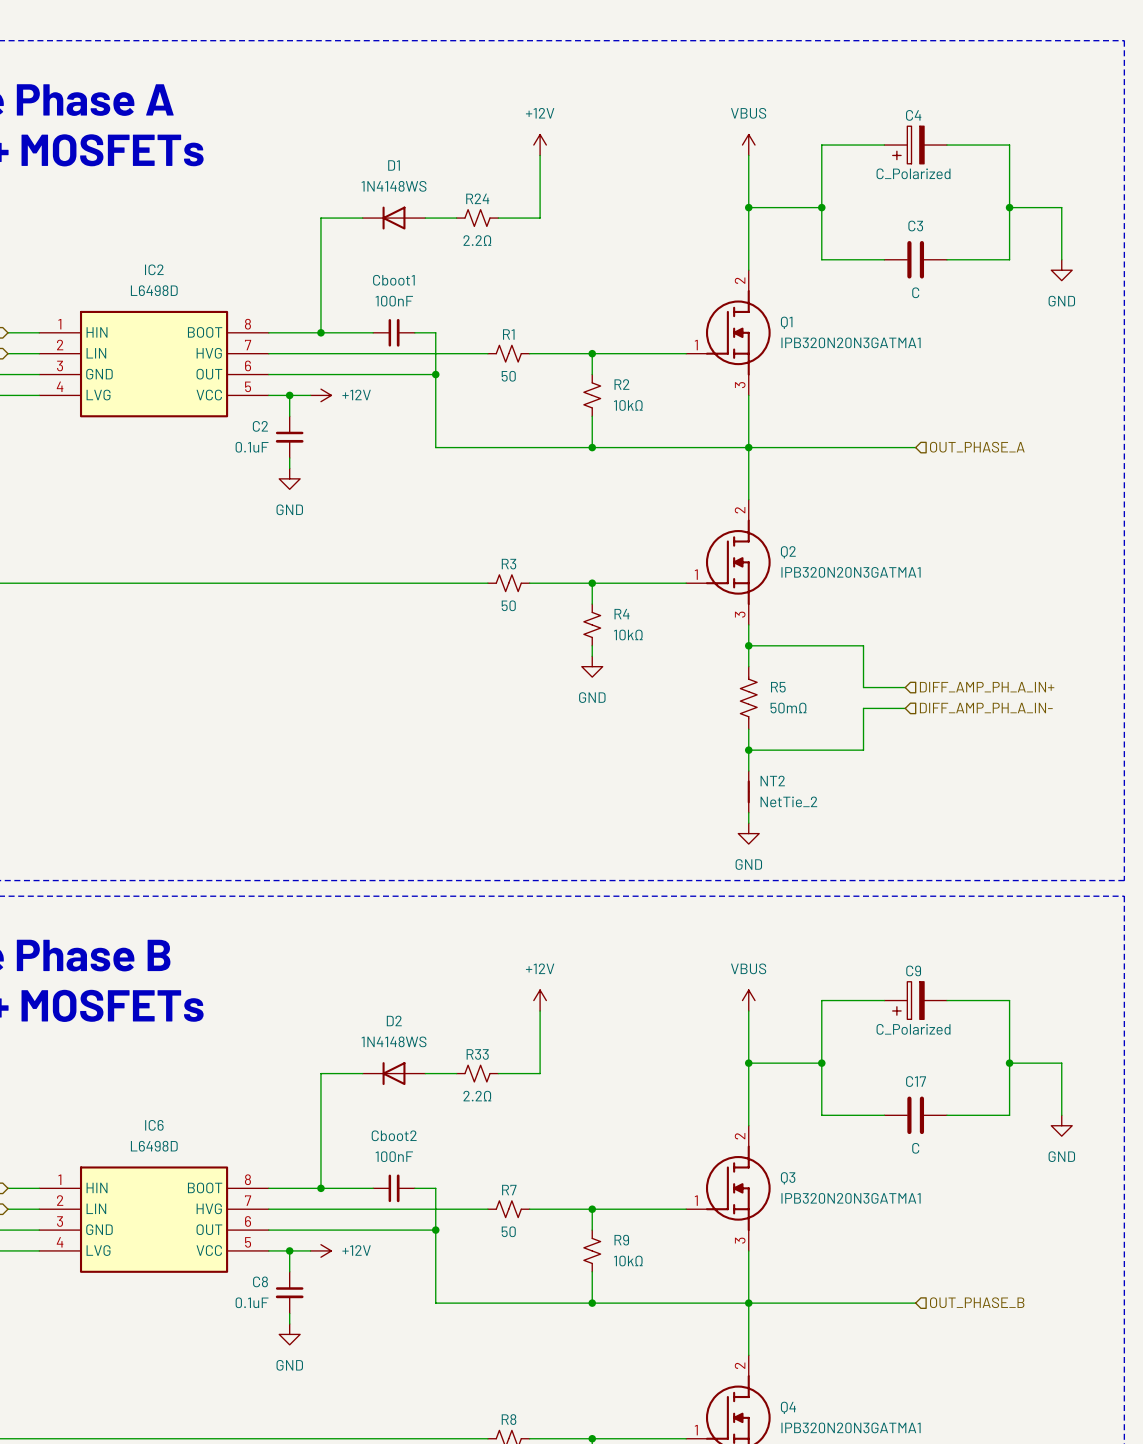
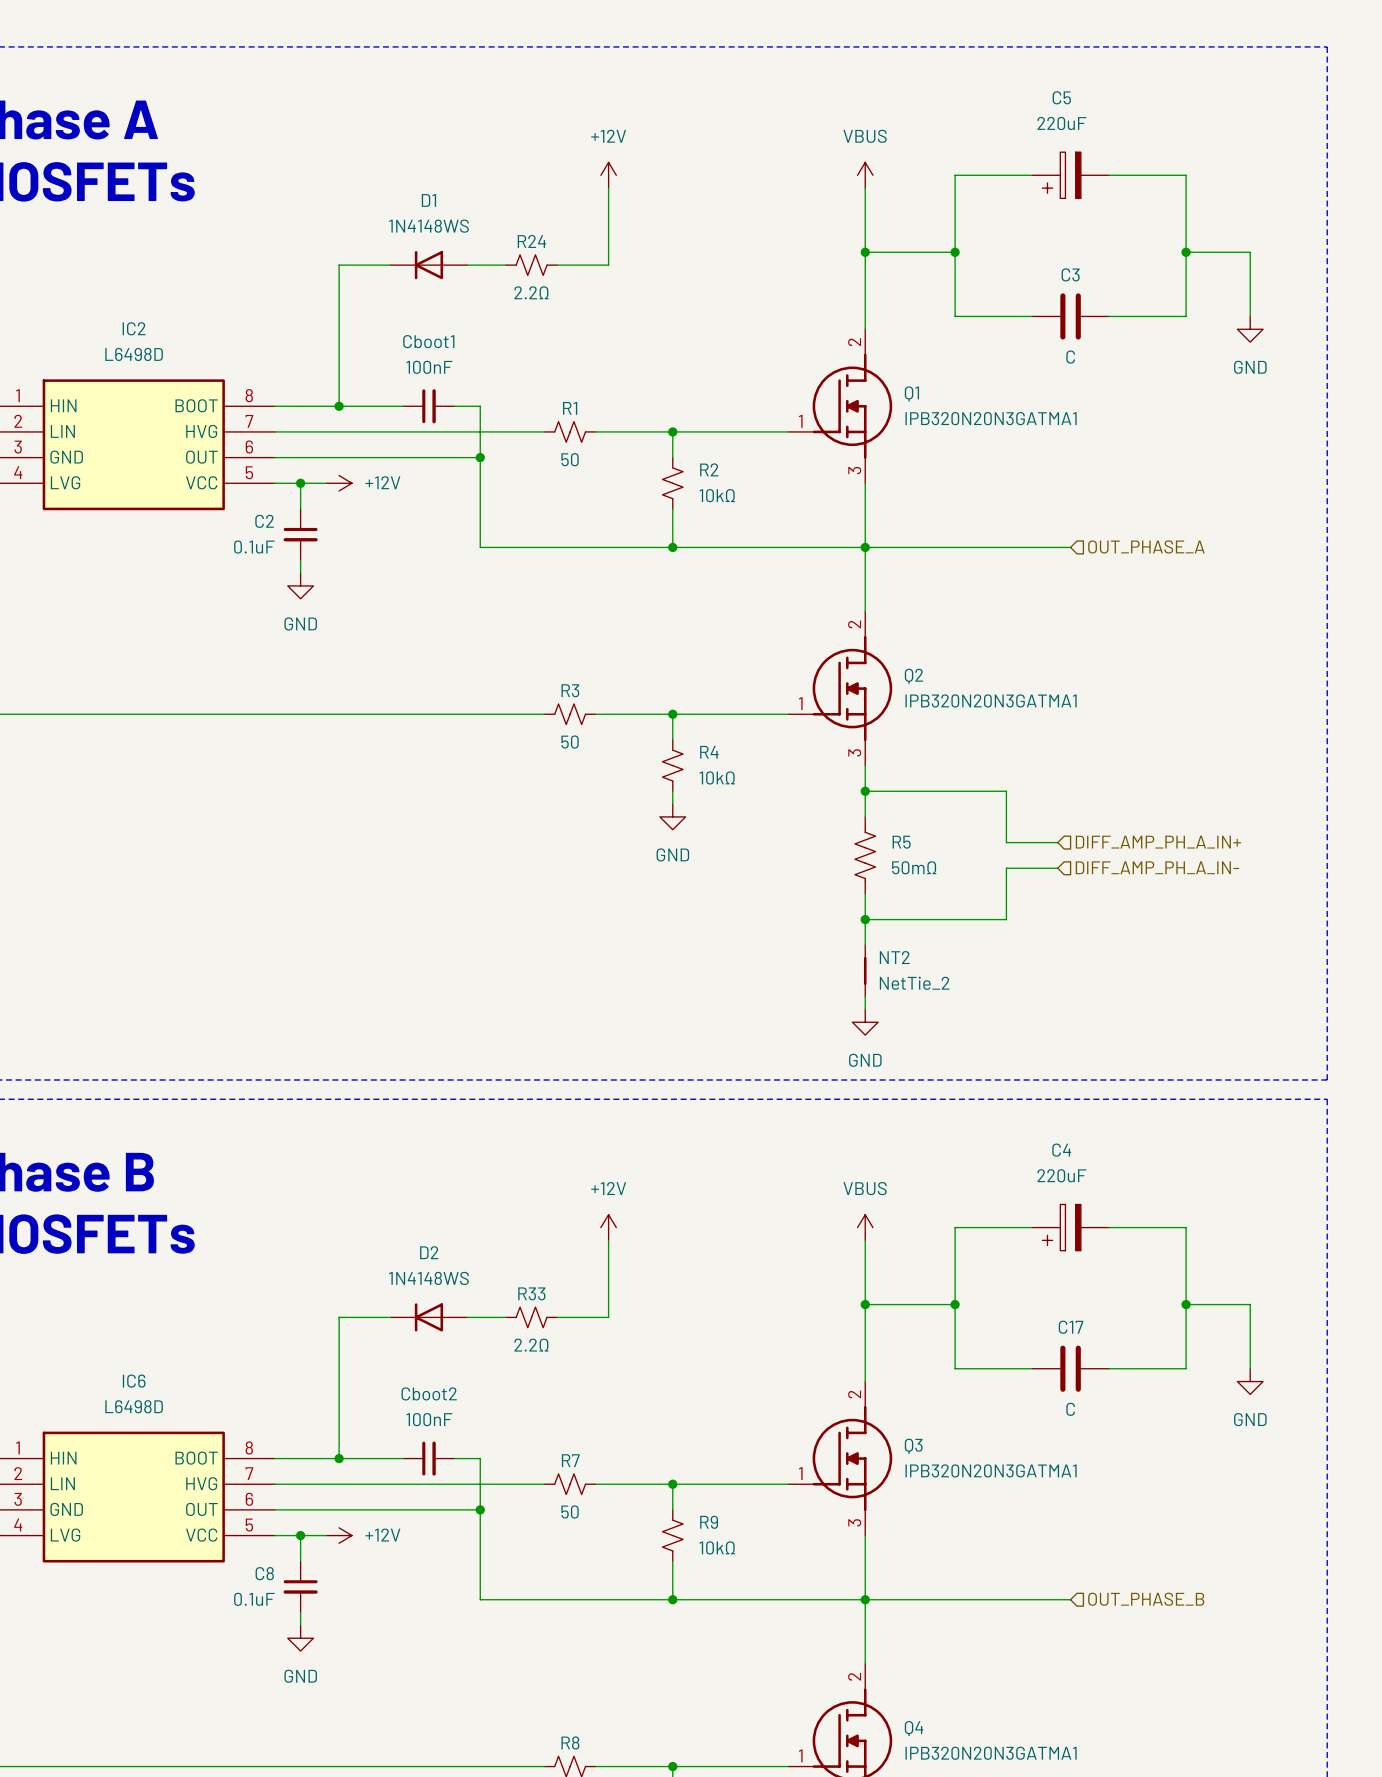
C4 name: C4 (913, 115) -> C5 (1061, 97)
C4 value: C_Polarized (913, 173) -> 220uF (1061, 123)
C9 name: C9 (913, 970) -> C4 (1061, 1150)
C9 value: C_Polarized (913, 1029) -> 220uF (1061, 1175)

